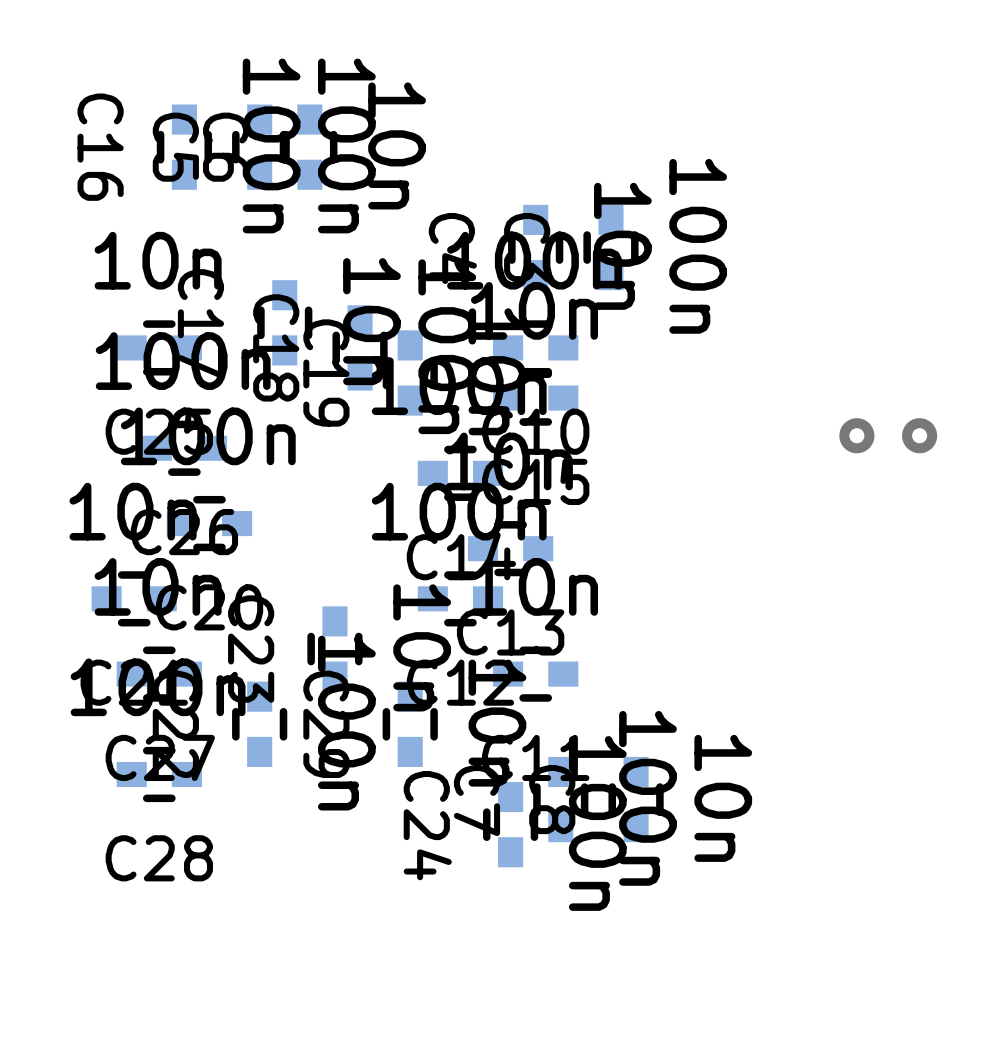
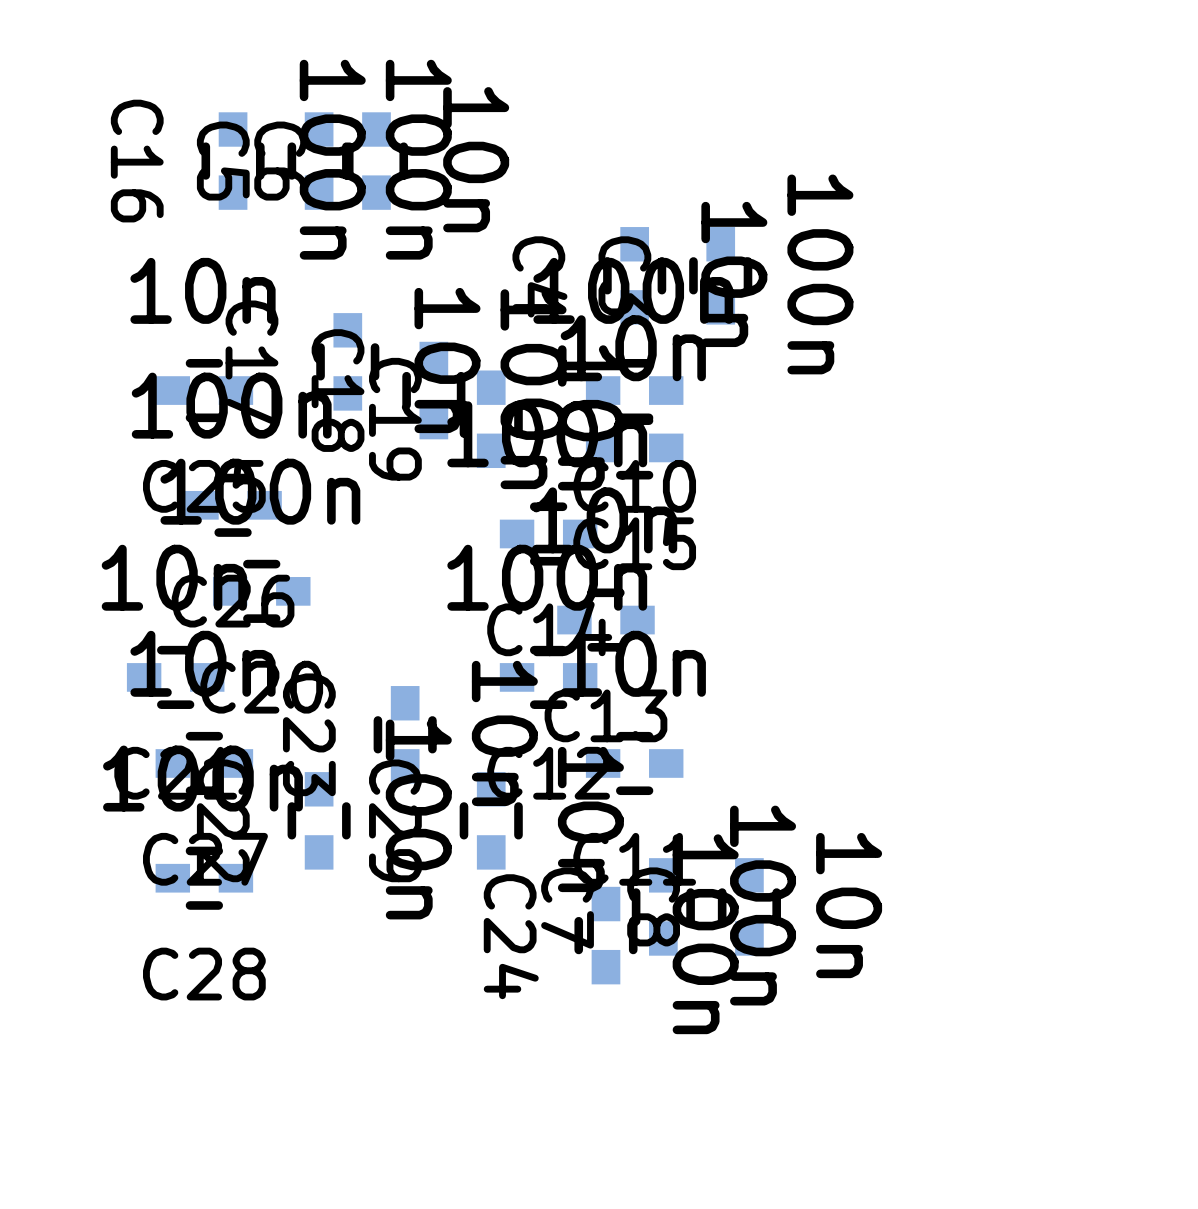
via: (856, 435) -> none
via: (919, 435) -> none

